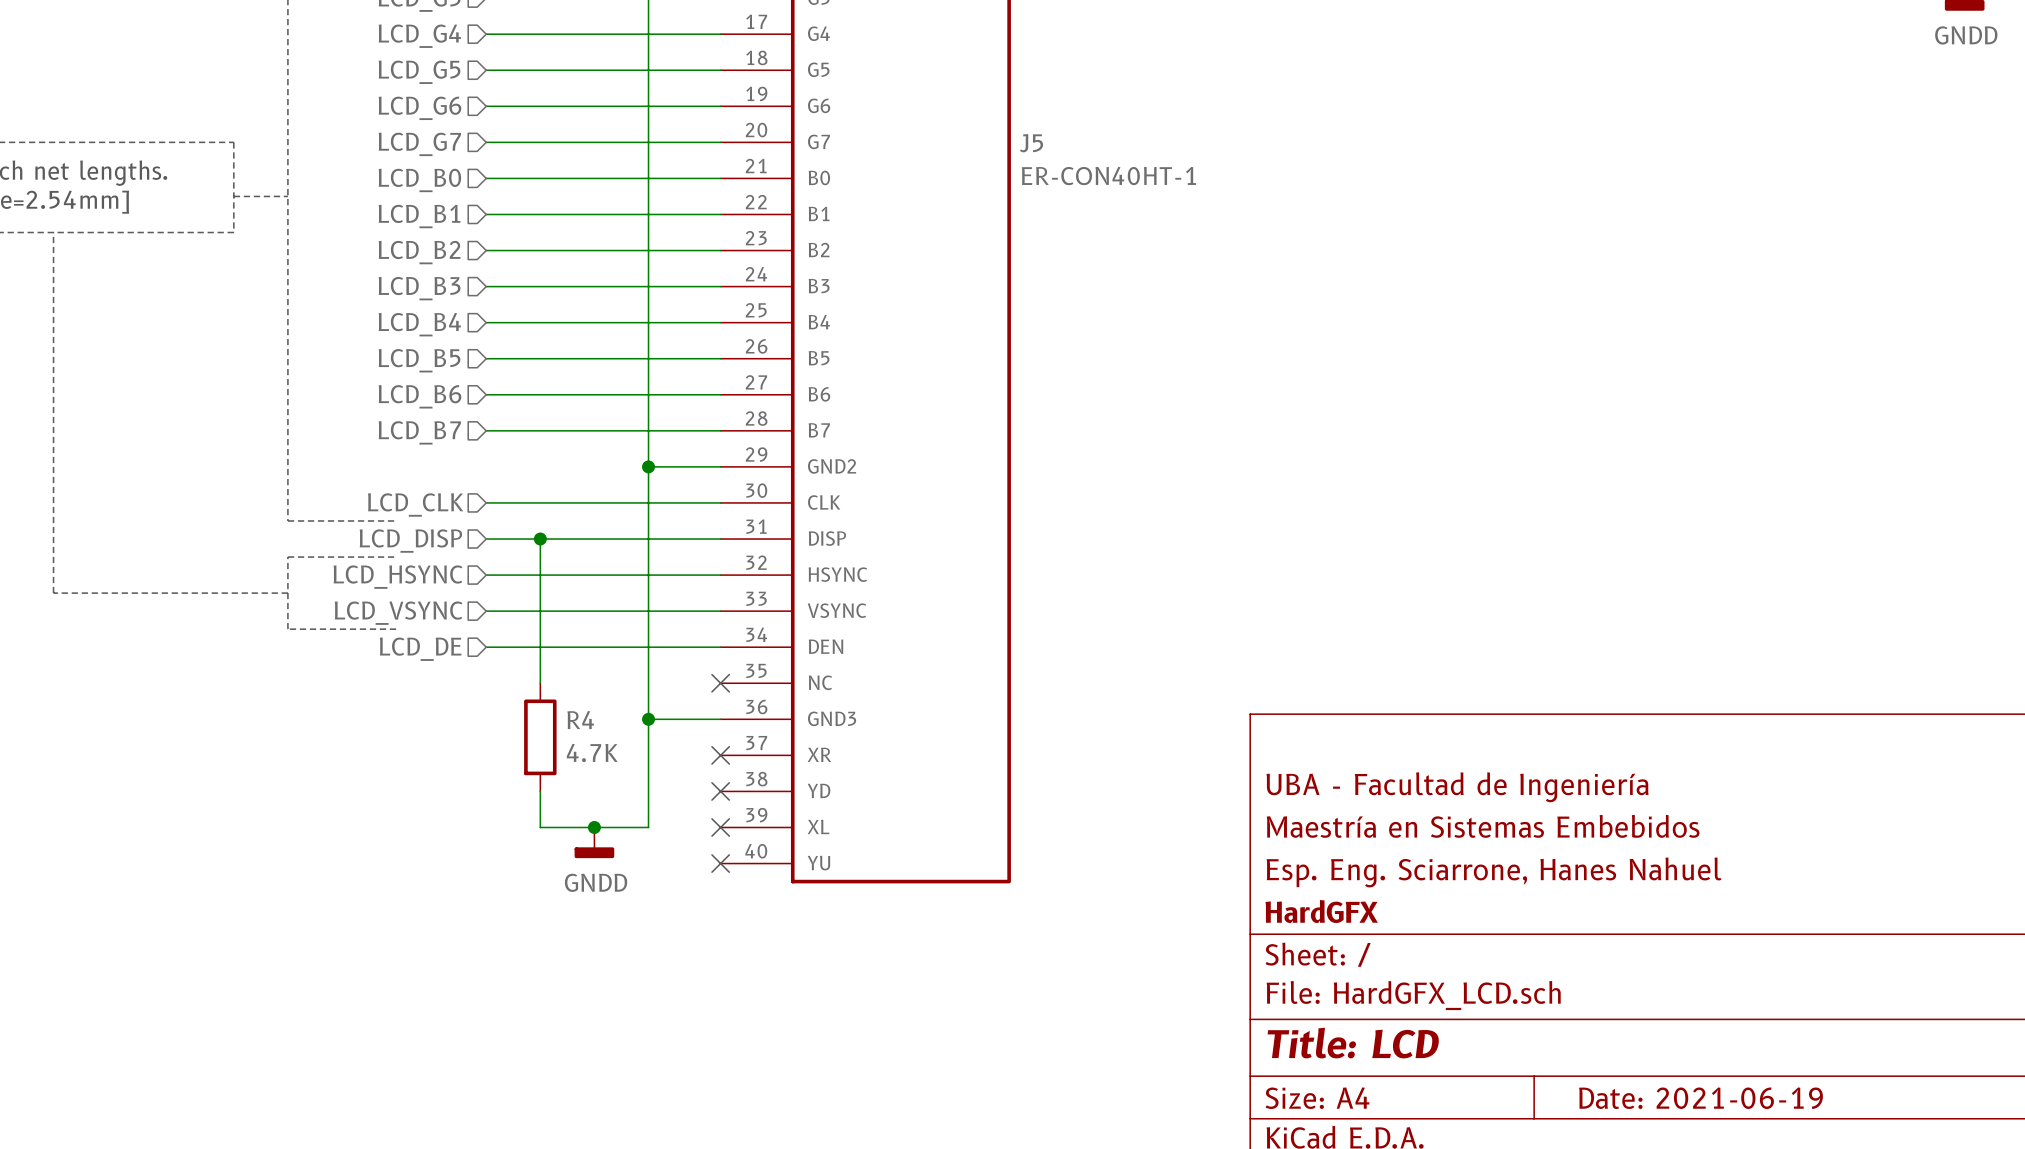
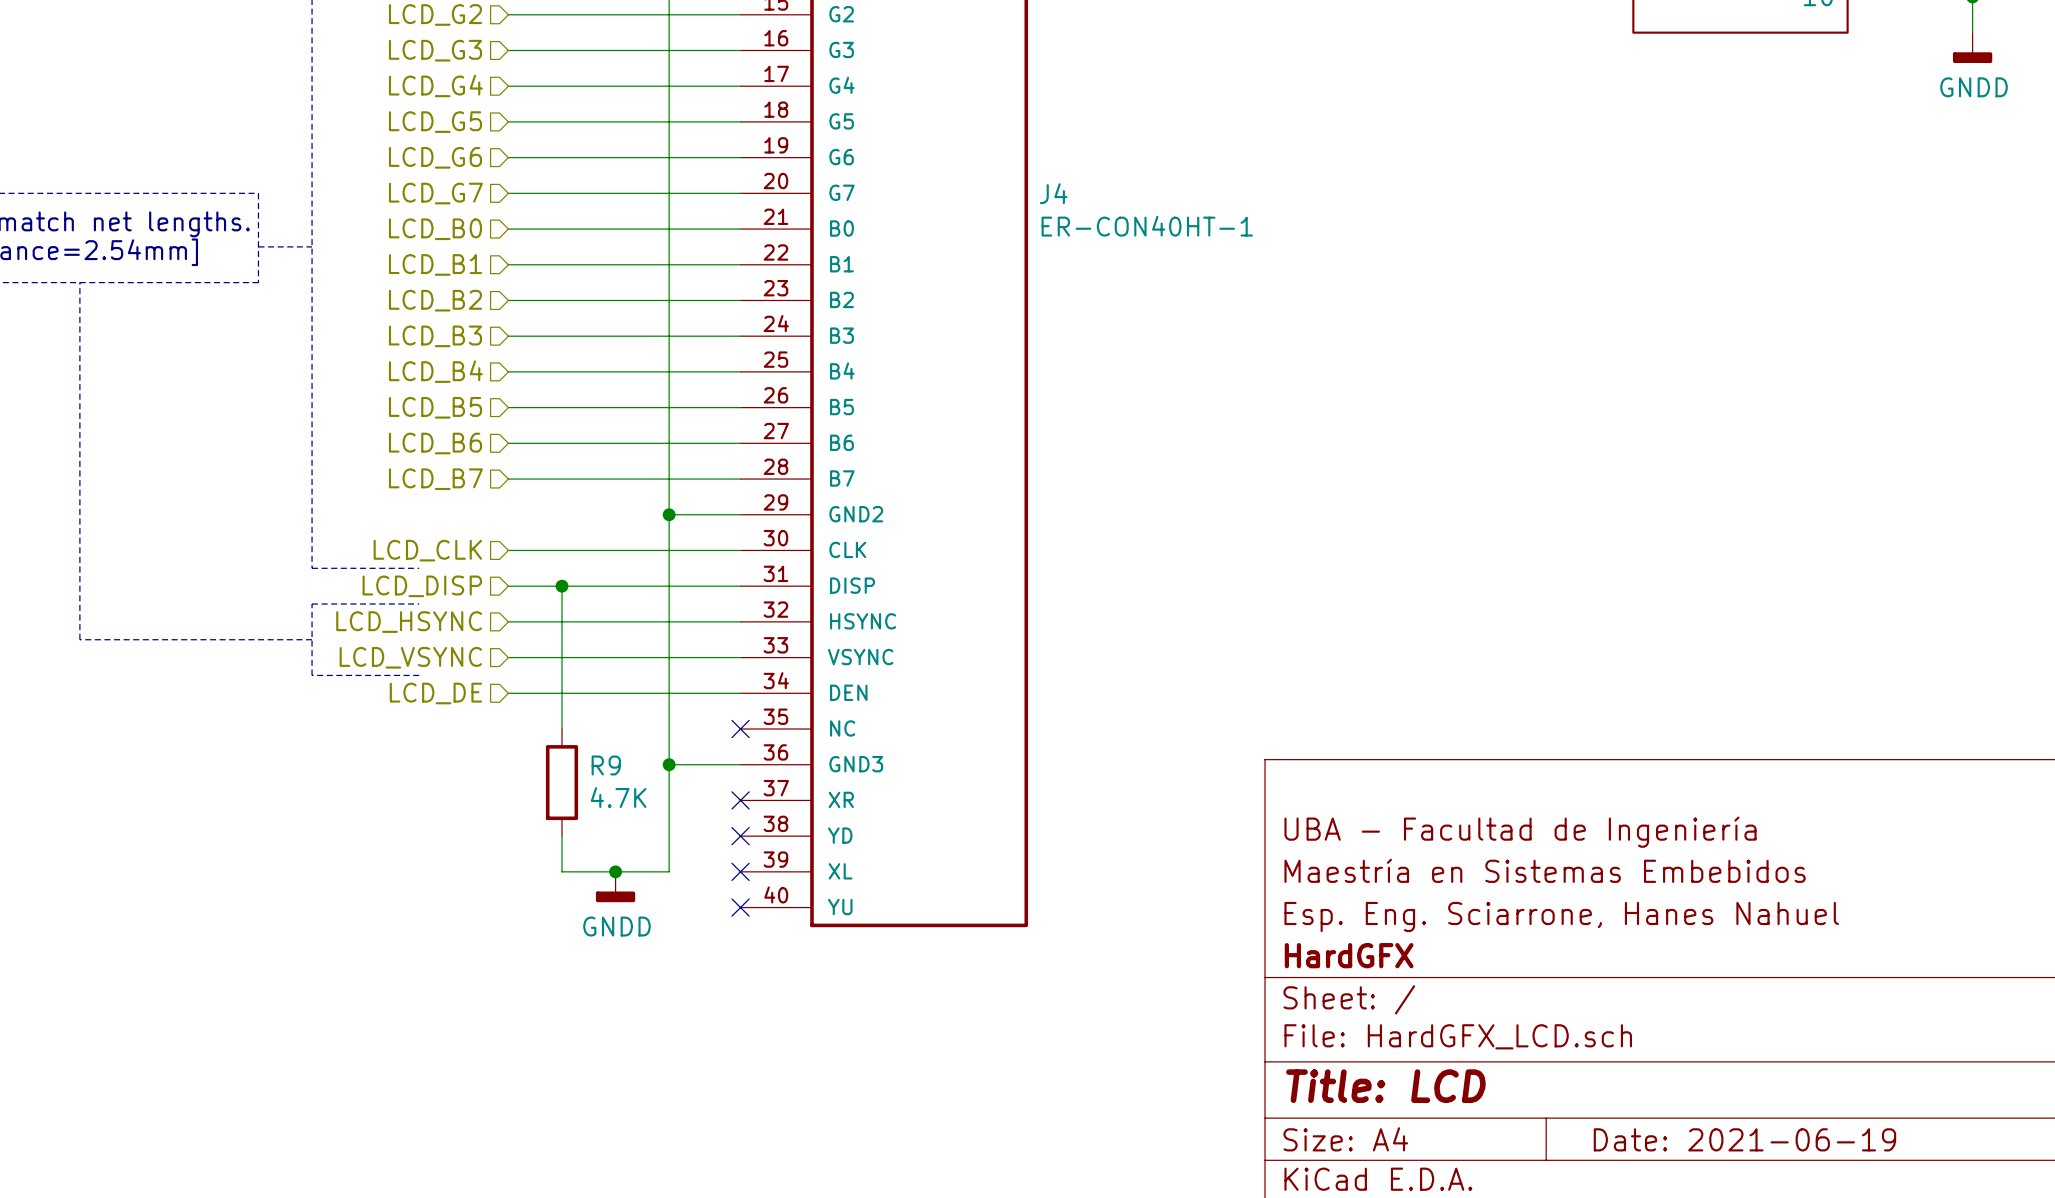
J5 name: J5 (1031, 143) -> J4 (1053, 193)
R4 name: R4 (580, 720) -> R9 (606, 765)

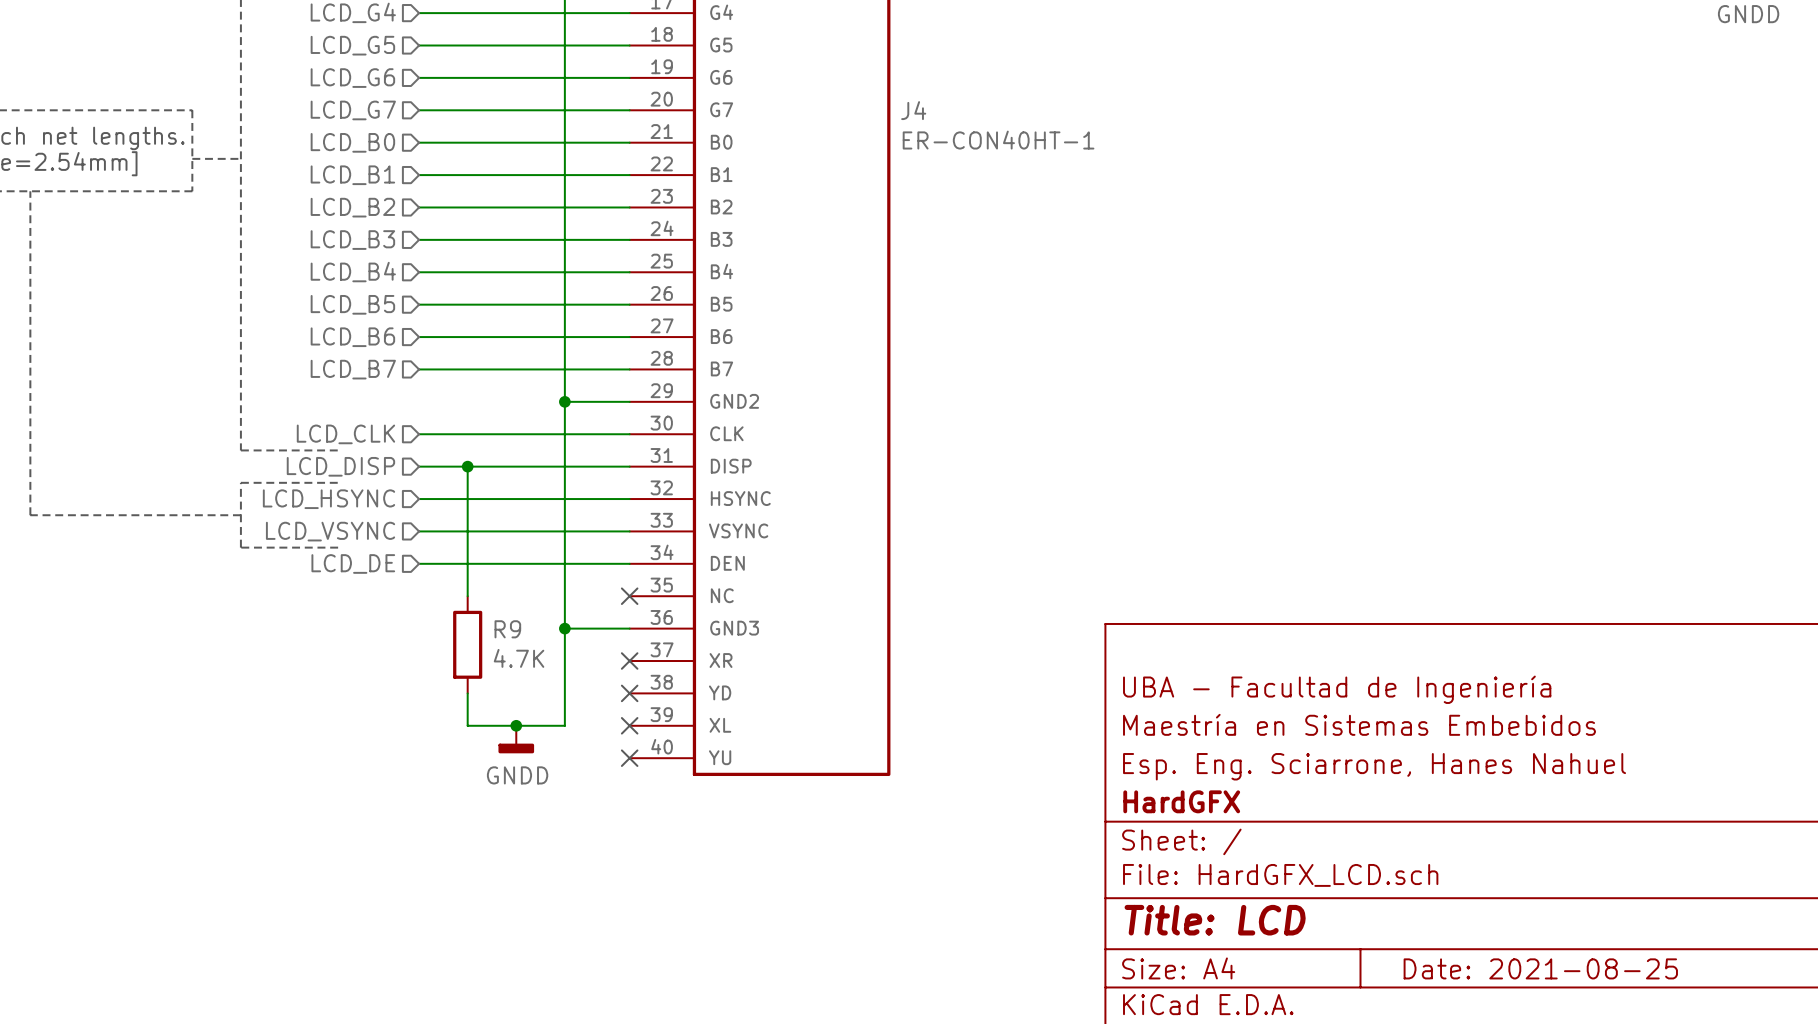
title block: Date: 2021-06-19 (1744, 1139) -> Date: 2021-08-25 (1540, 968)

